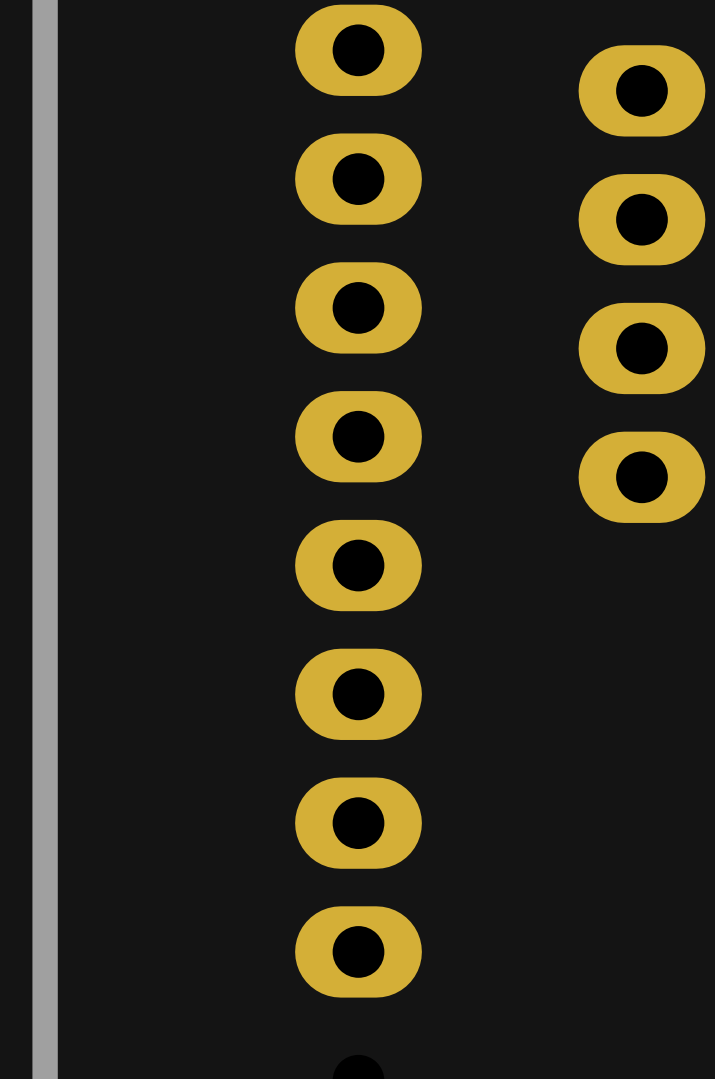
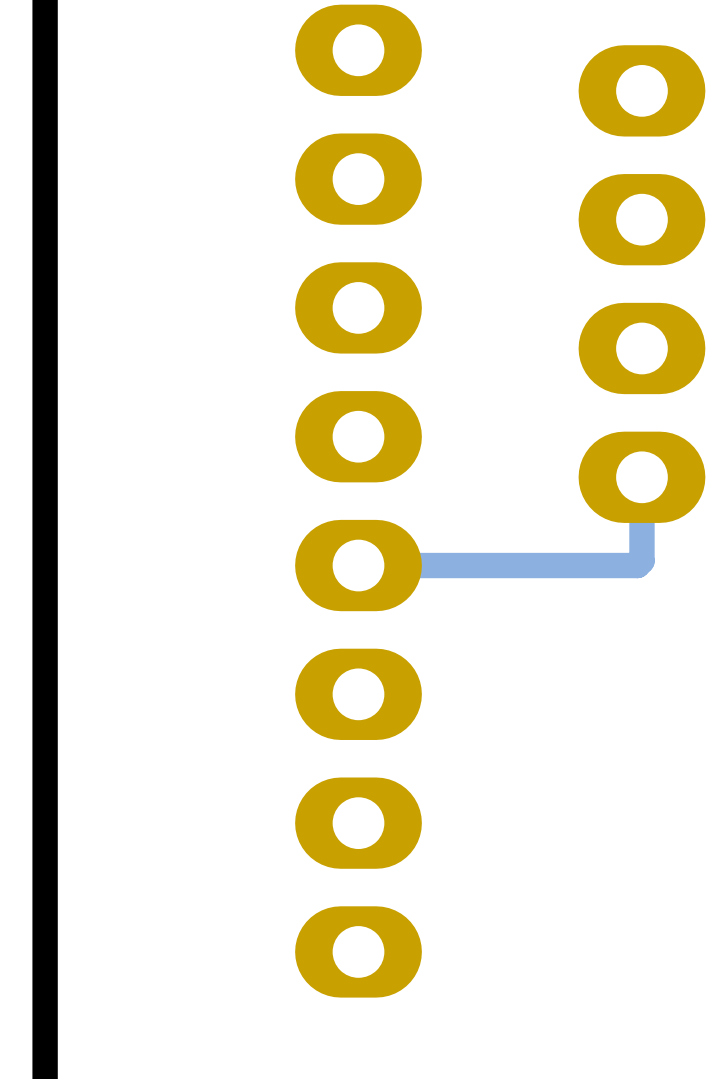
track: none -> (641, 477) (641, 561) (637, 565) (358, 565)

